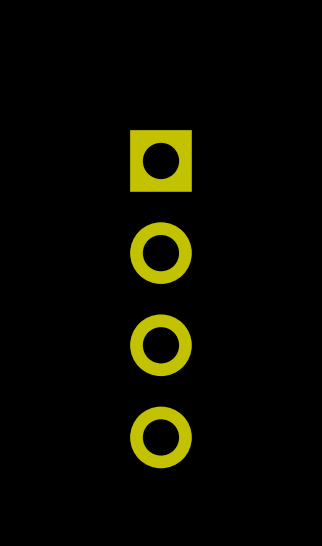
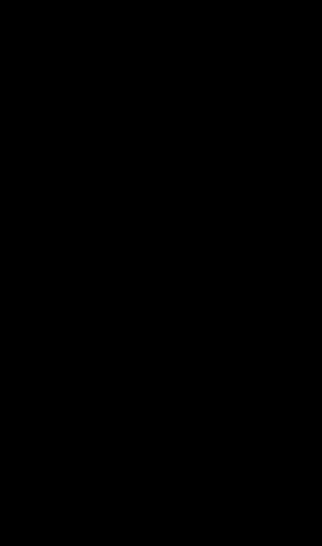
part: (160, 299) -> none

